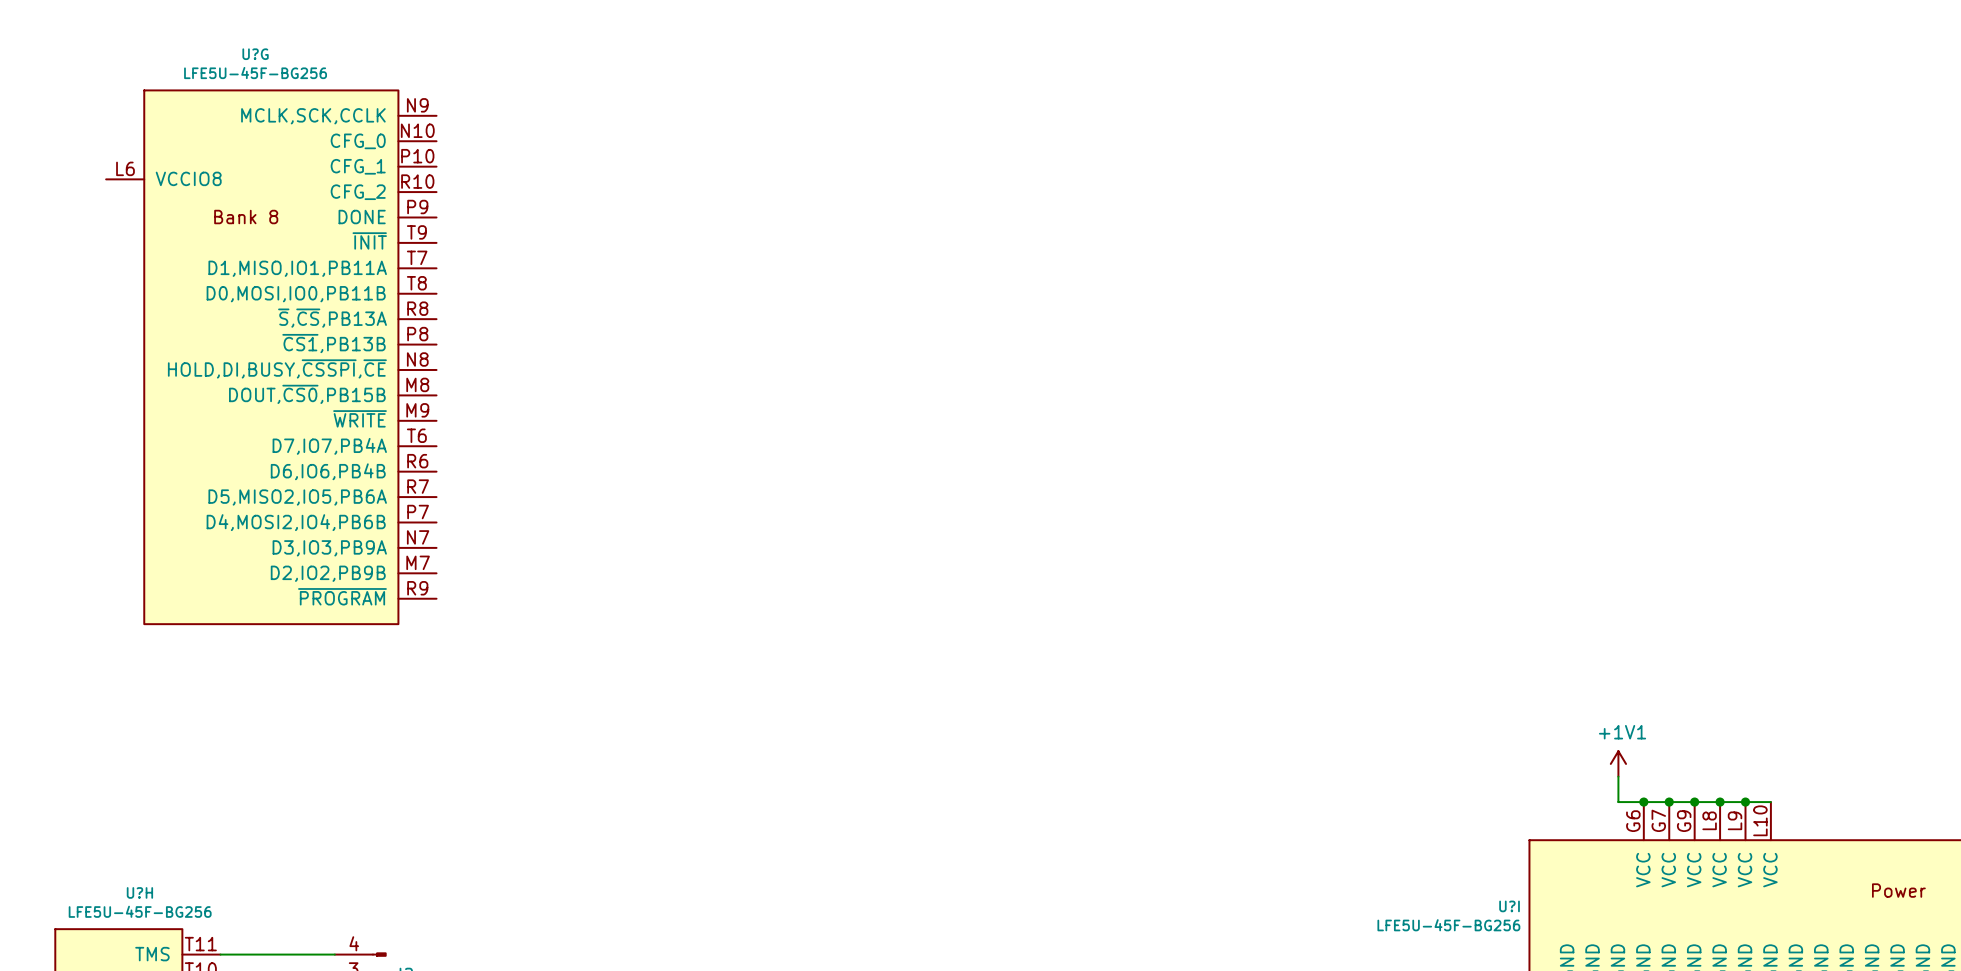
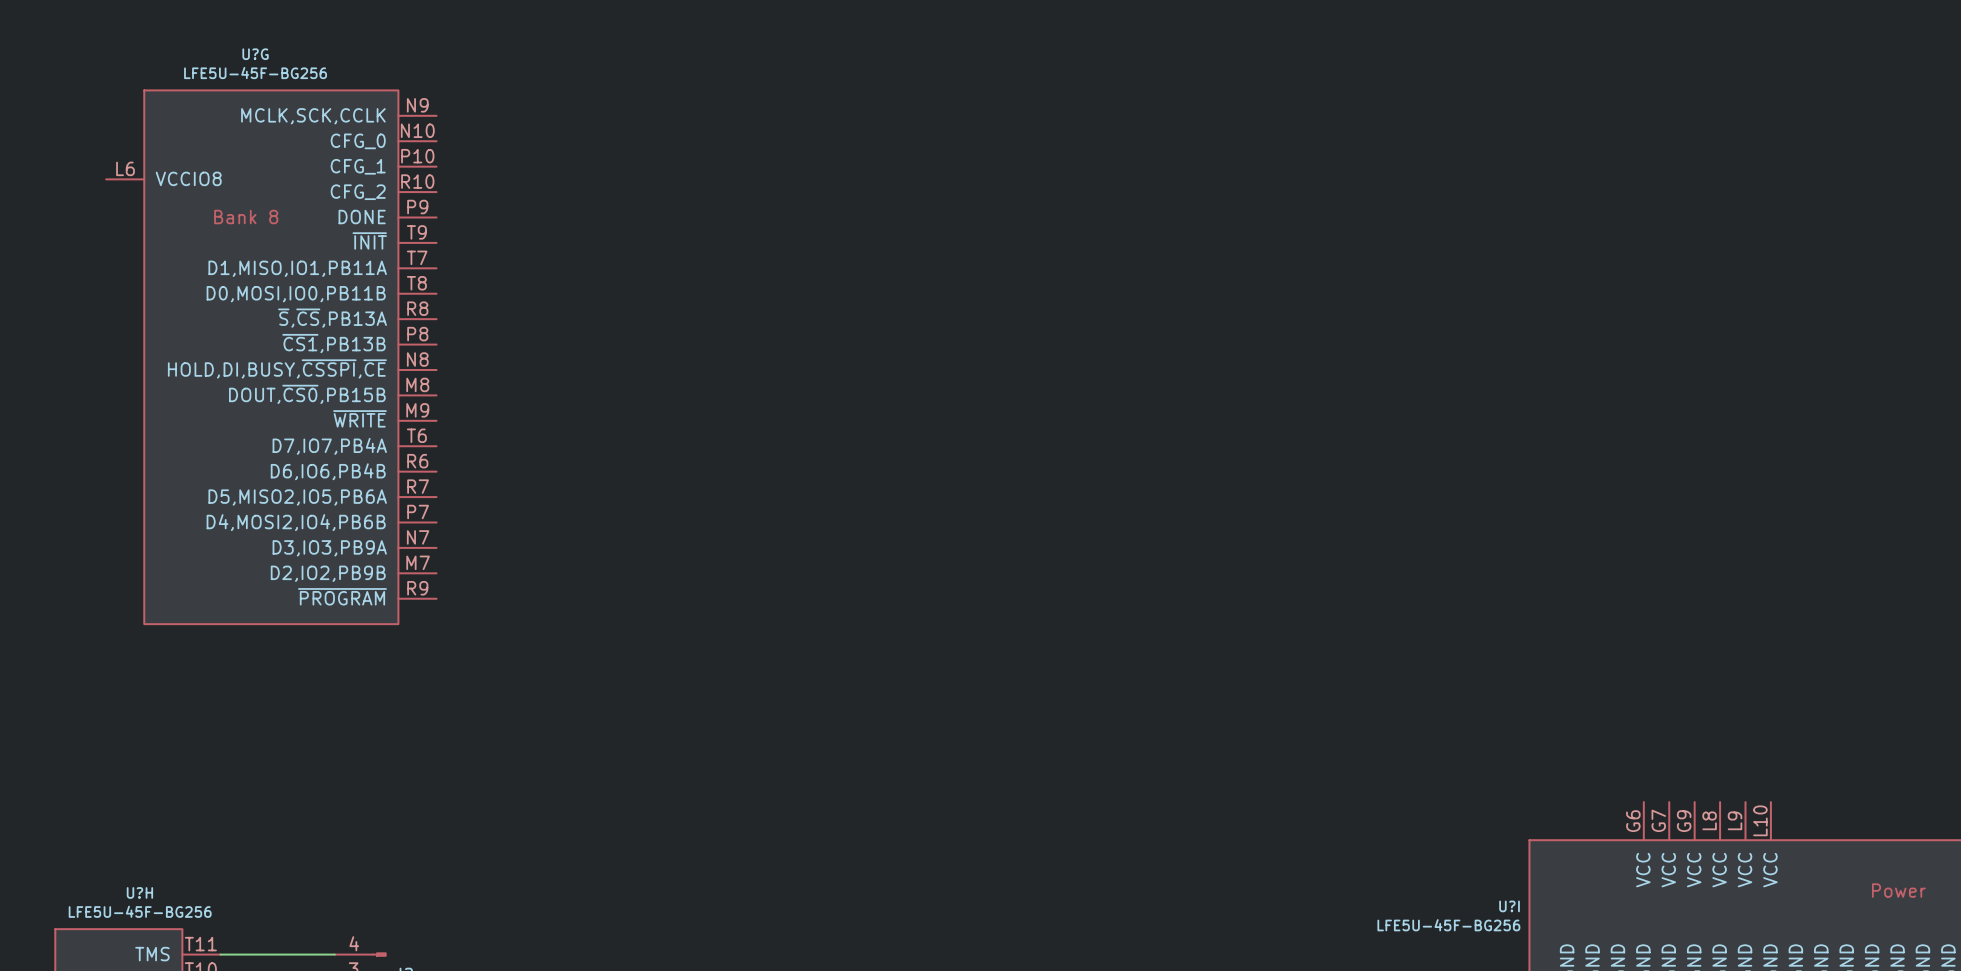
power symbol: +1V1 (1618, 763) -> none
wire: (1618, 776) (1618, 802) (1770, 802) -> none
junction: (1643, 802) -> none
junction: (1669, 802) -> none
junction: (1694, 802) -> none
junction: (1720, 802) -> none
junction: (1745, 802) -> none

